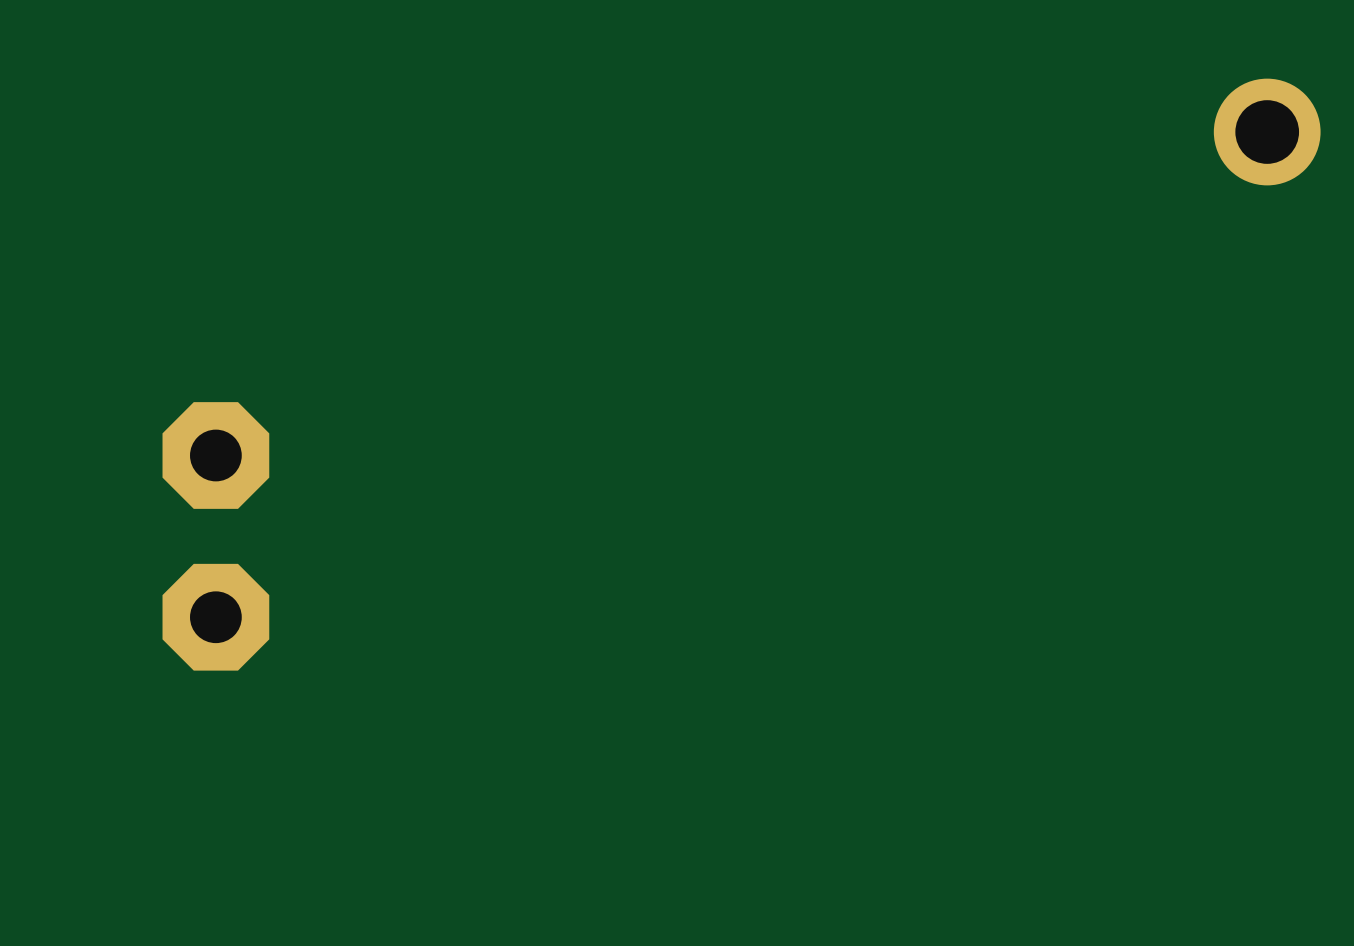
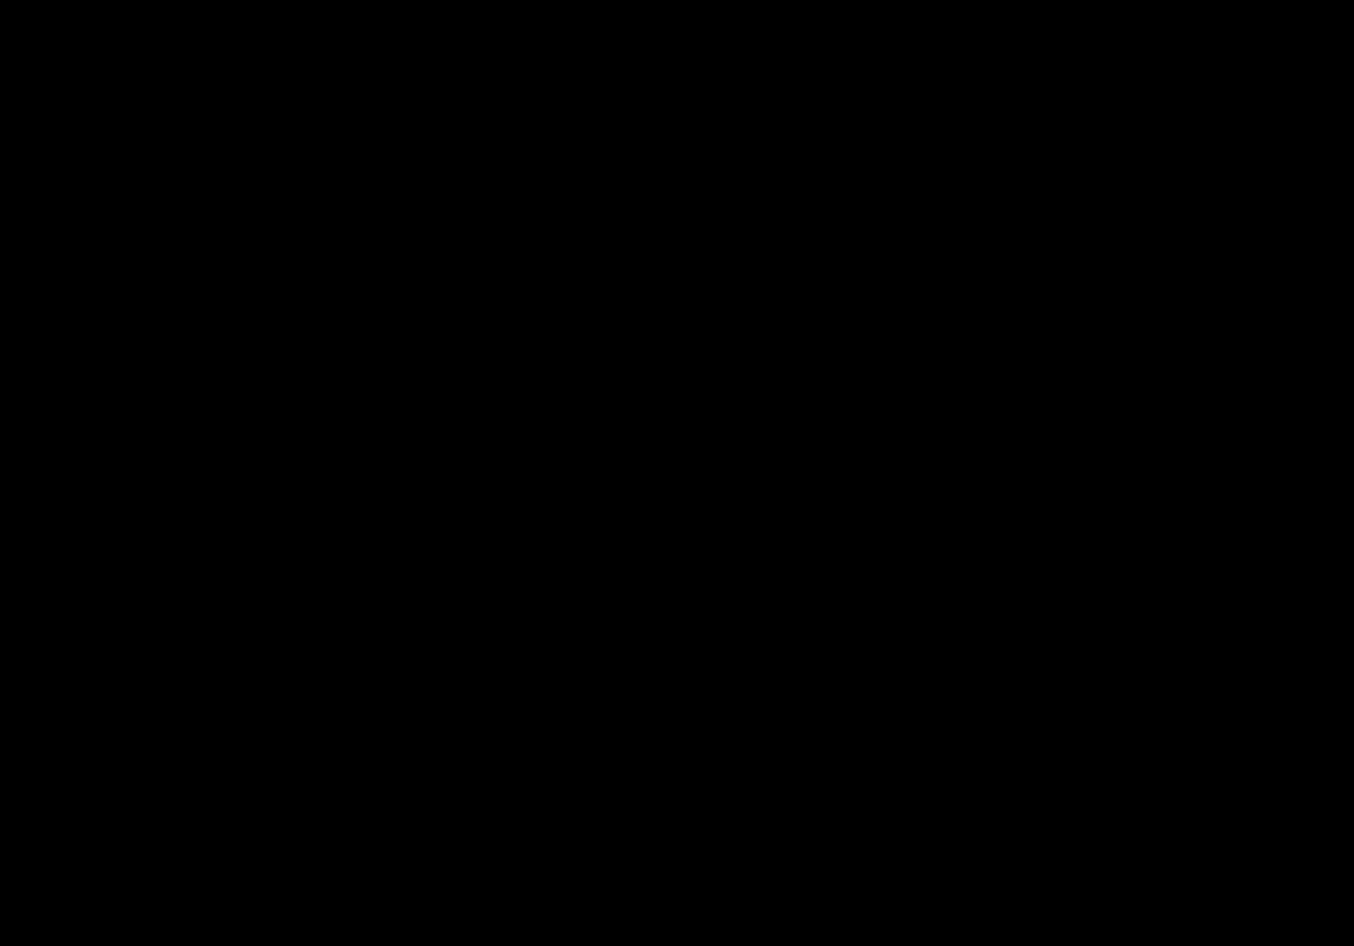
part: (1267, 132) -> none
part: (215, 536) -> none

